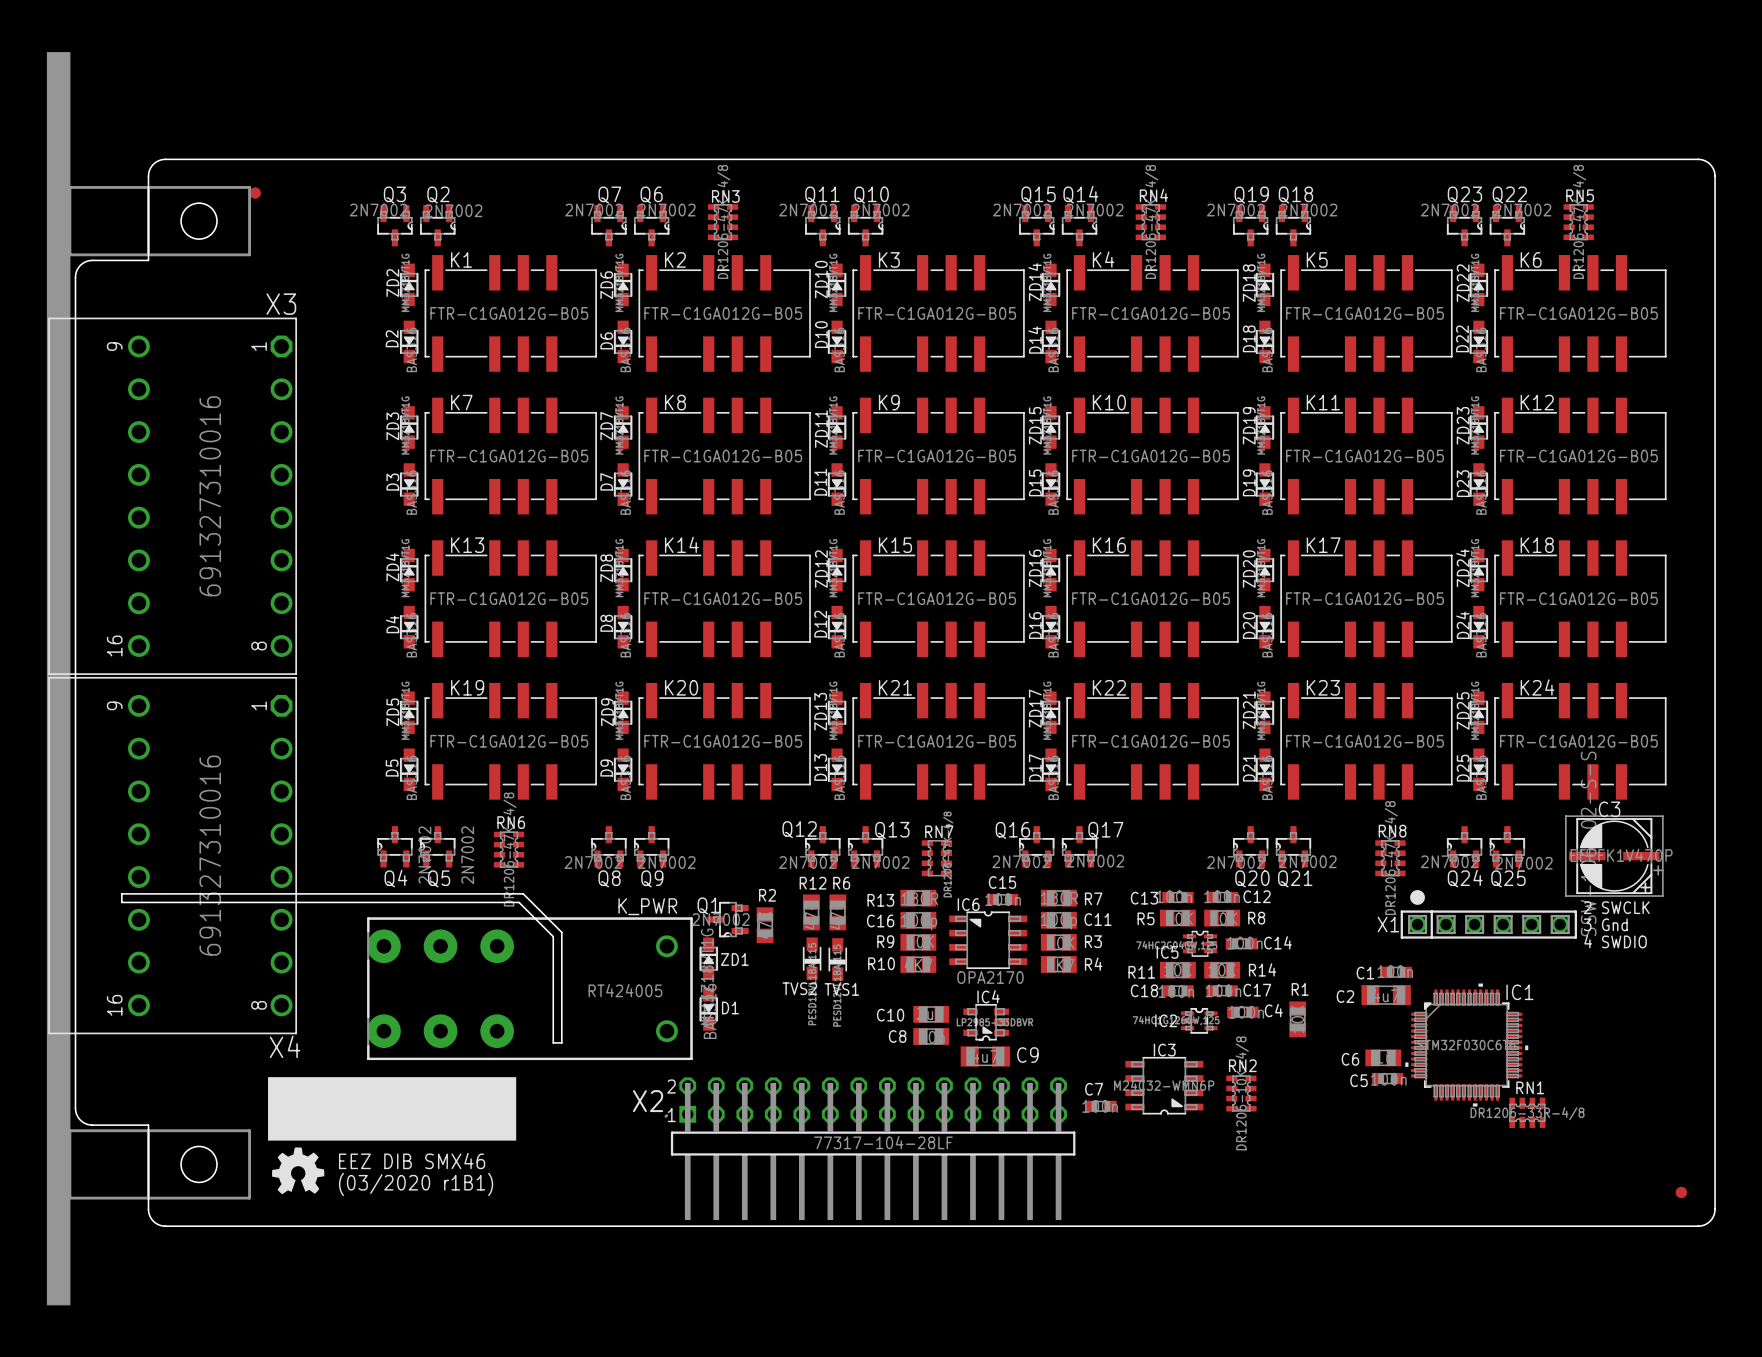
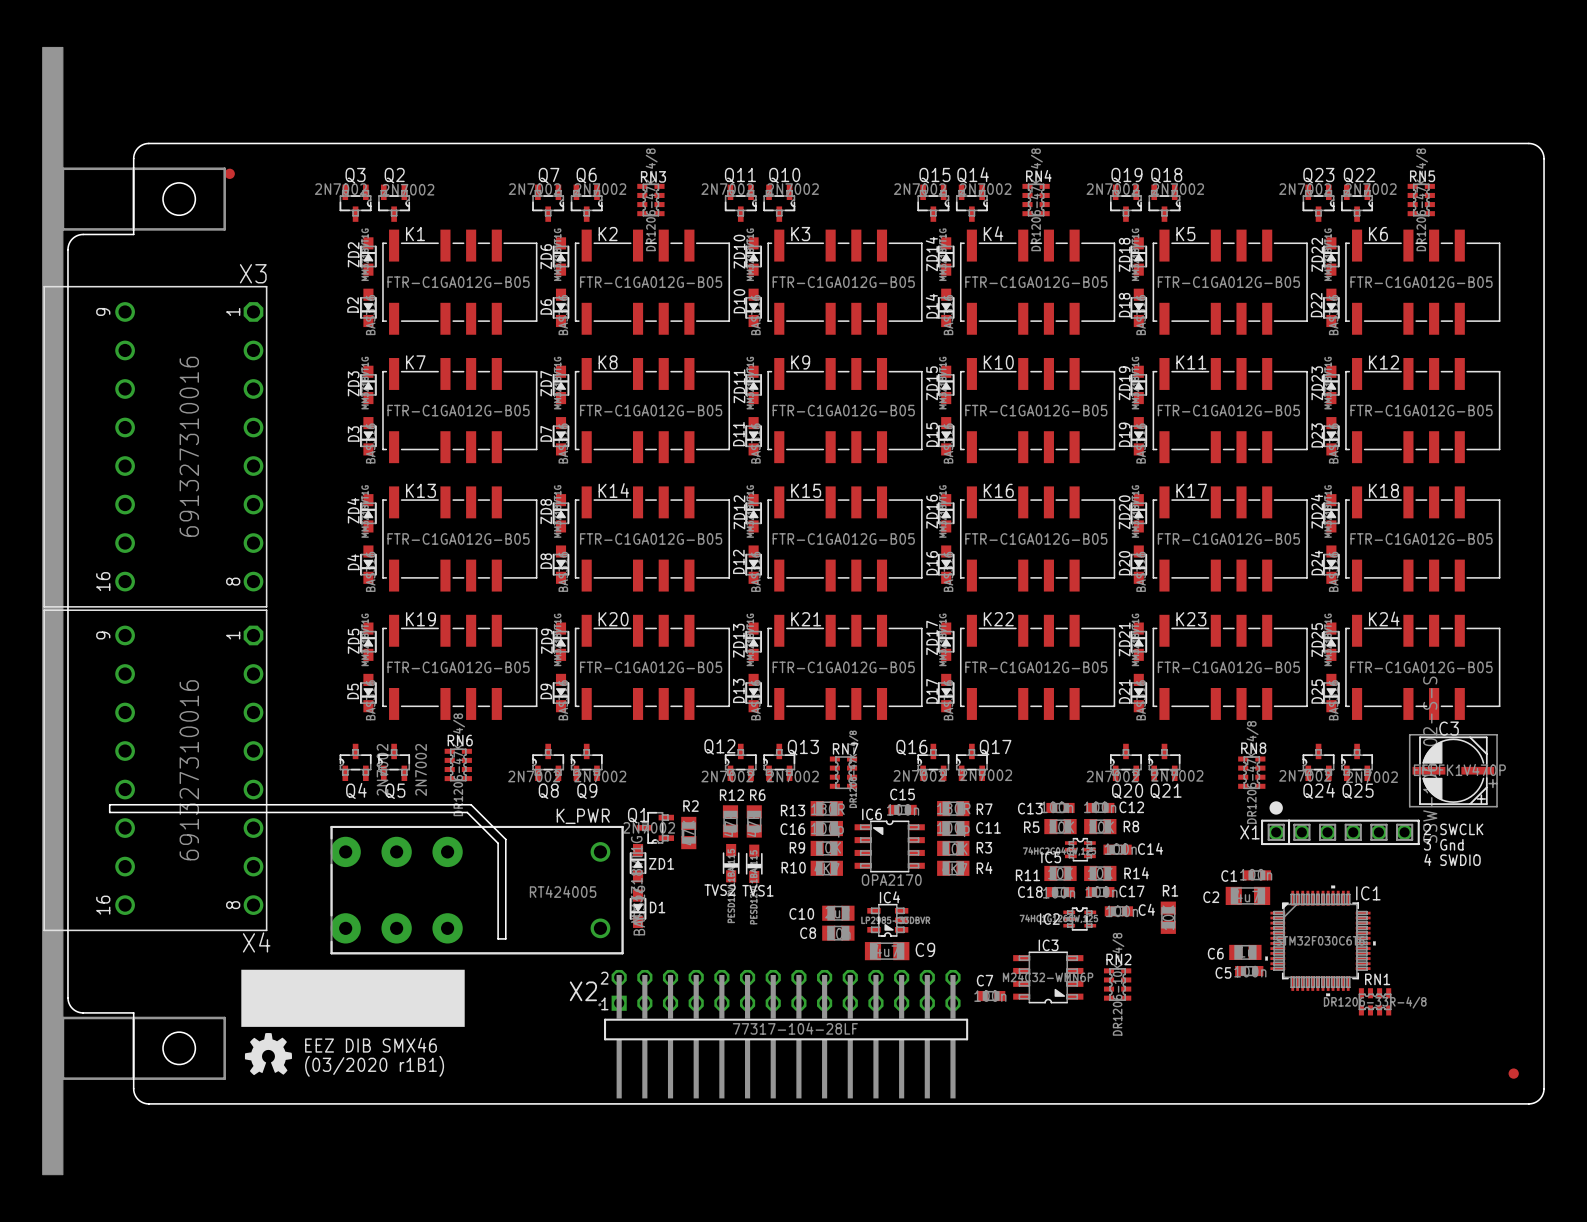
text: 2 SWCLK (1616, 907) -> none
text: 3 Gnd (1605, 924) -> 2 SWCLK (1453, 829)
text: 4 SWDIO (1615, 941) -> 3 Gnd (1443, 844)
text: none -> 4 SWDIO (1452, 859)

